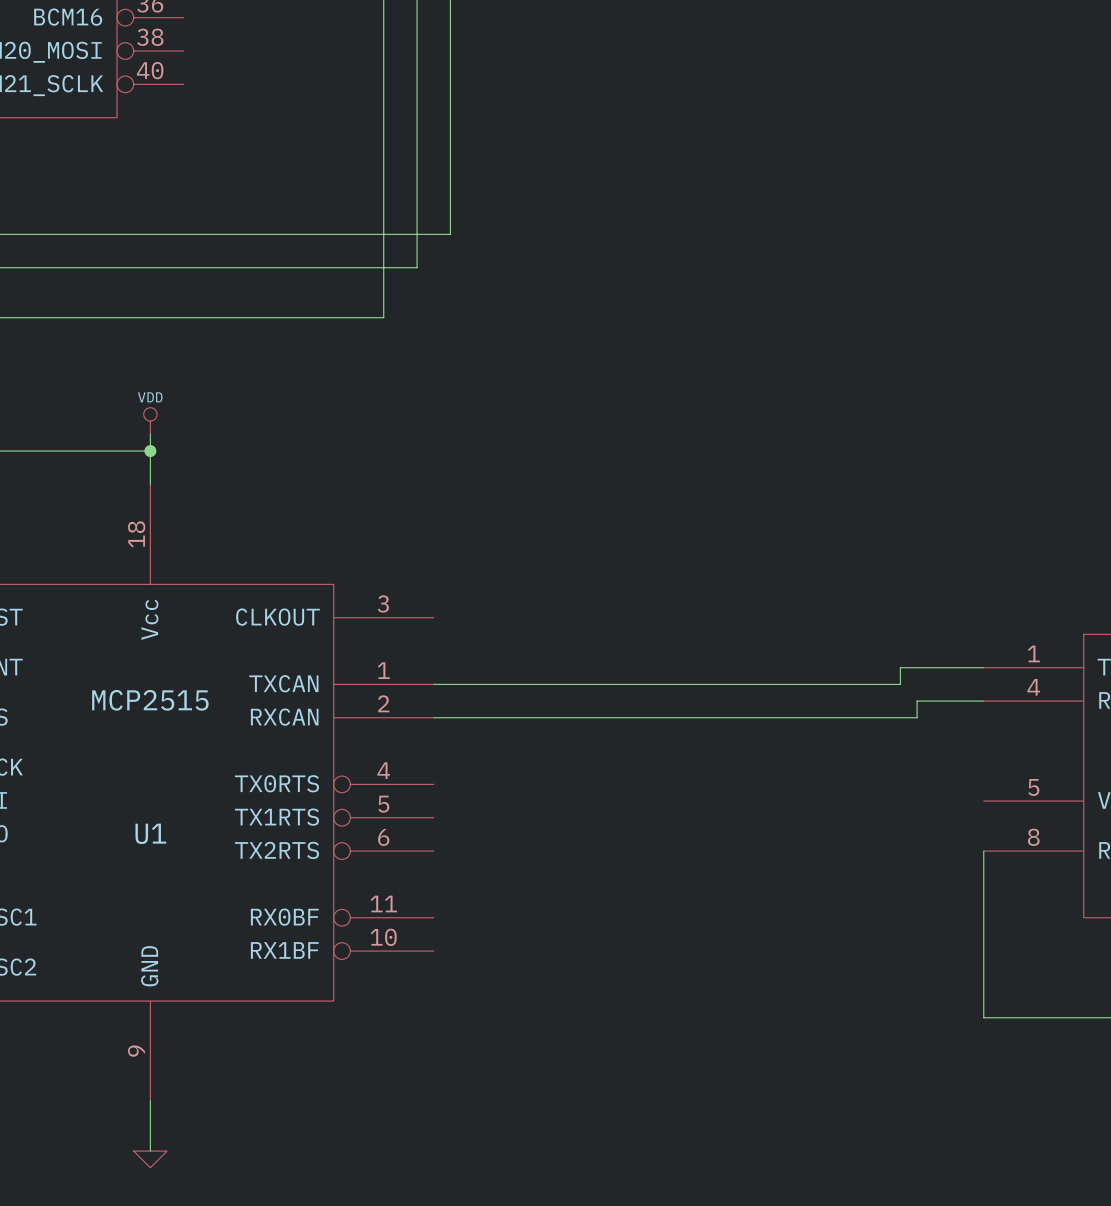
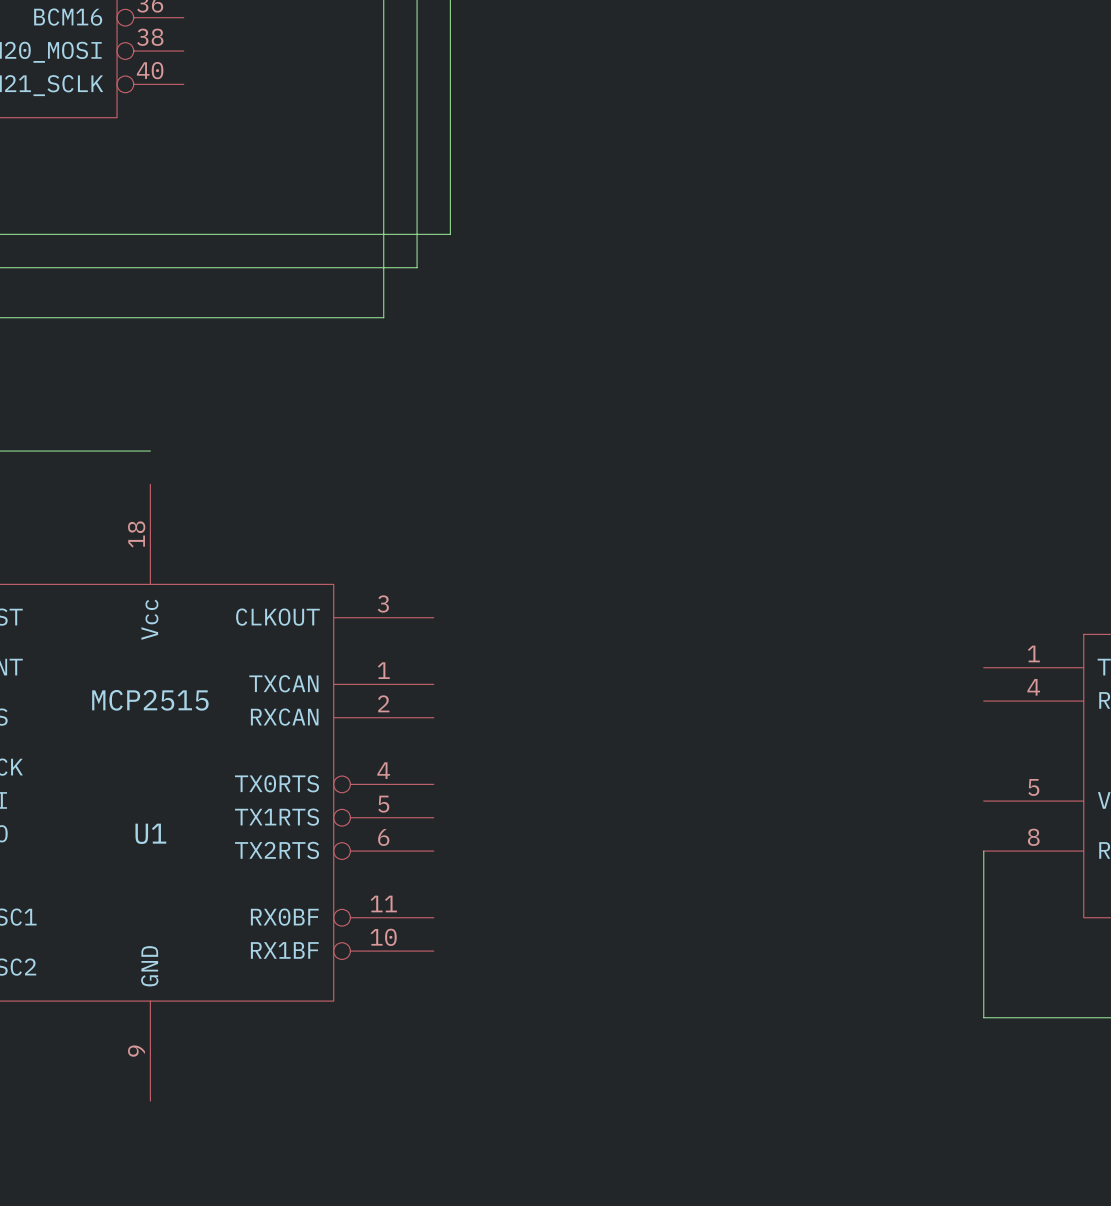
power symbol: VDD (150, 421) -> none
wire: (150, 434) (150, 484) -> none
junction: (150, 451) -> none
wire: (983, 667) (900, 667) (900, 684) (433, 684) -> none
wire: (983, 701) (917, 701) (917, 717) (433, 717) -> none
wire: (150, 1101) (150, 1151) -> none
power symbol: (150, 1159) -> none

